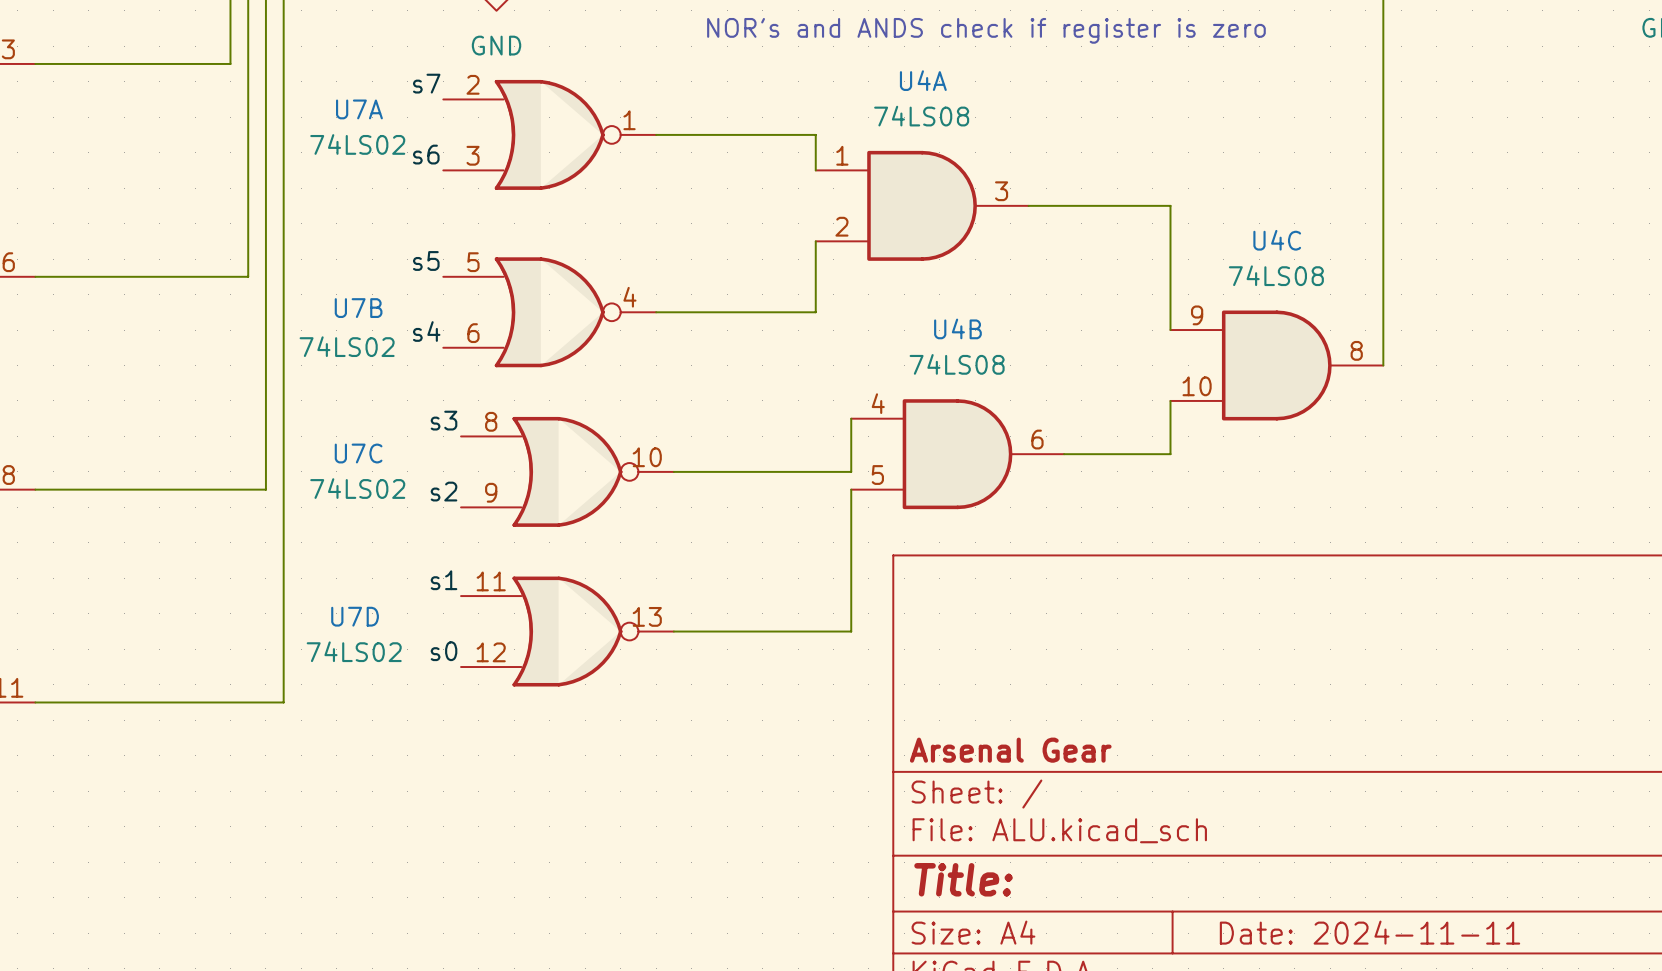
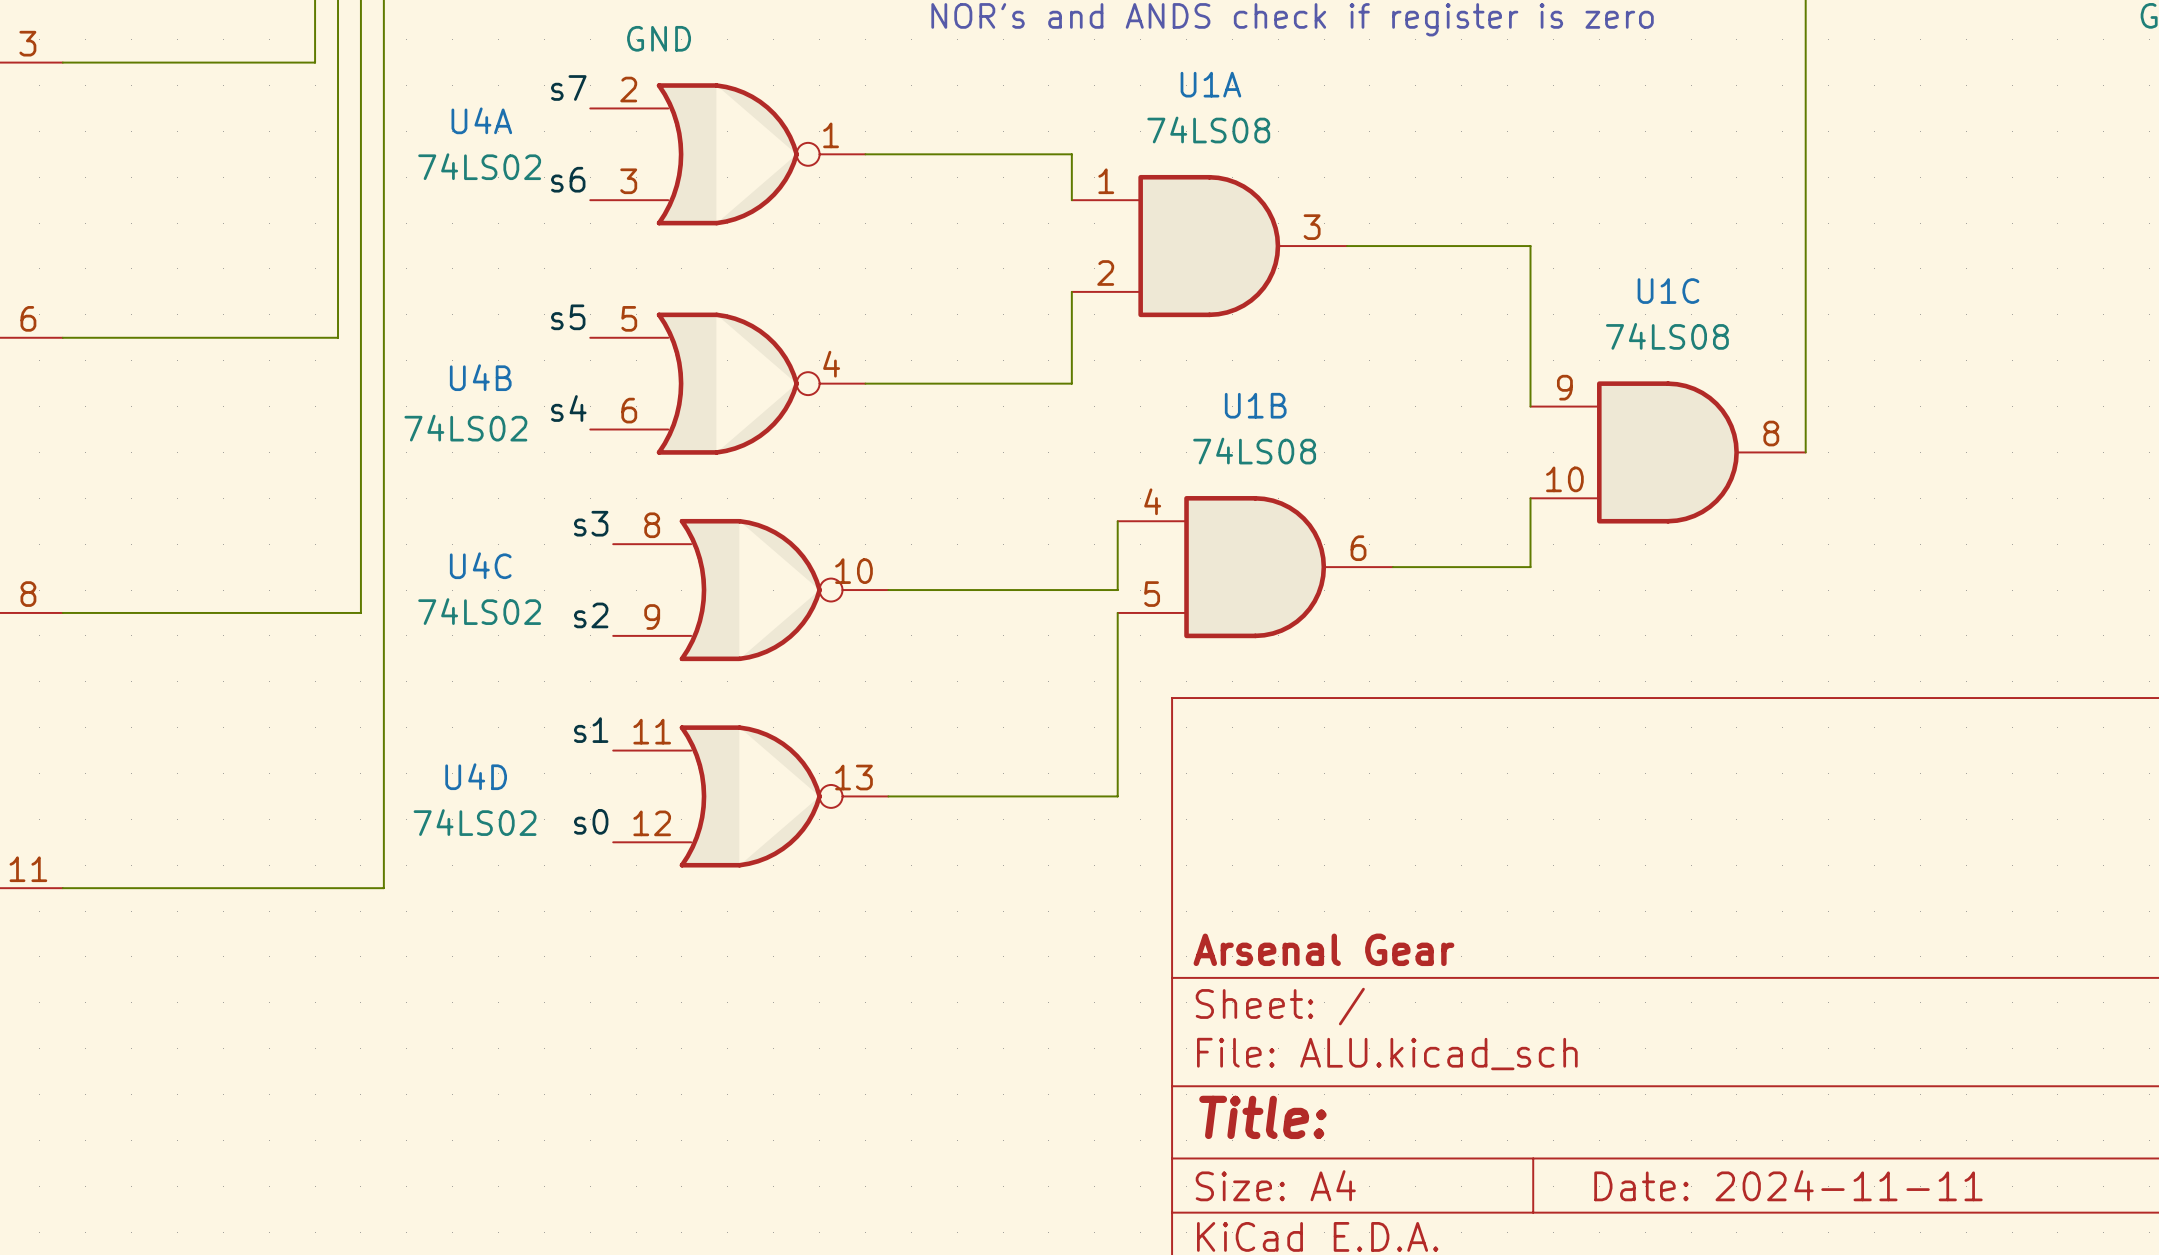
U4A name: U4A (923, 80) -> U1A (1210, 84)
U7A name: U7A (359, 109) -> U4A (481, 120)
U4C name: U4C (1277, 240) -> U1C (1668, 291)
U7B name: U7B (358, 308) -> U4B (480, 377)
U4B name: U4B (957, 328) -> U1B (1255, 405)
U7C name: U7C (358, 453) -> U4C (480, 565)
U7D name: U7D (355, 616) -> U4D (476, 776)

